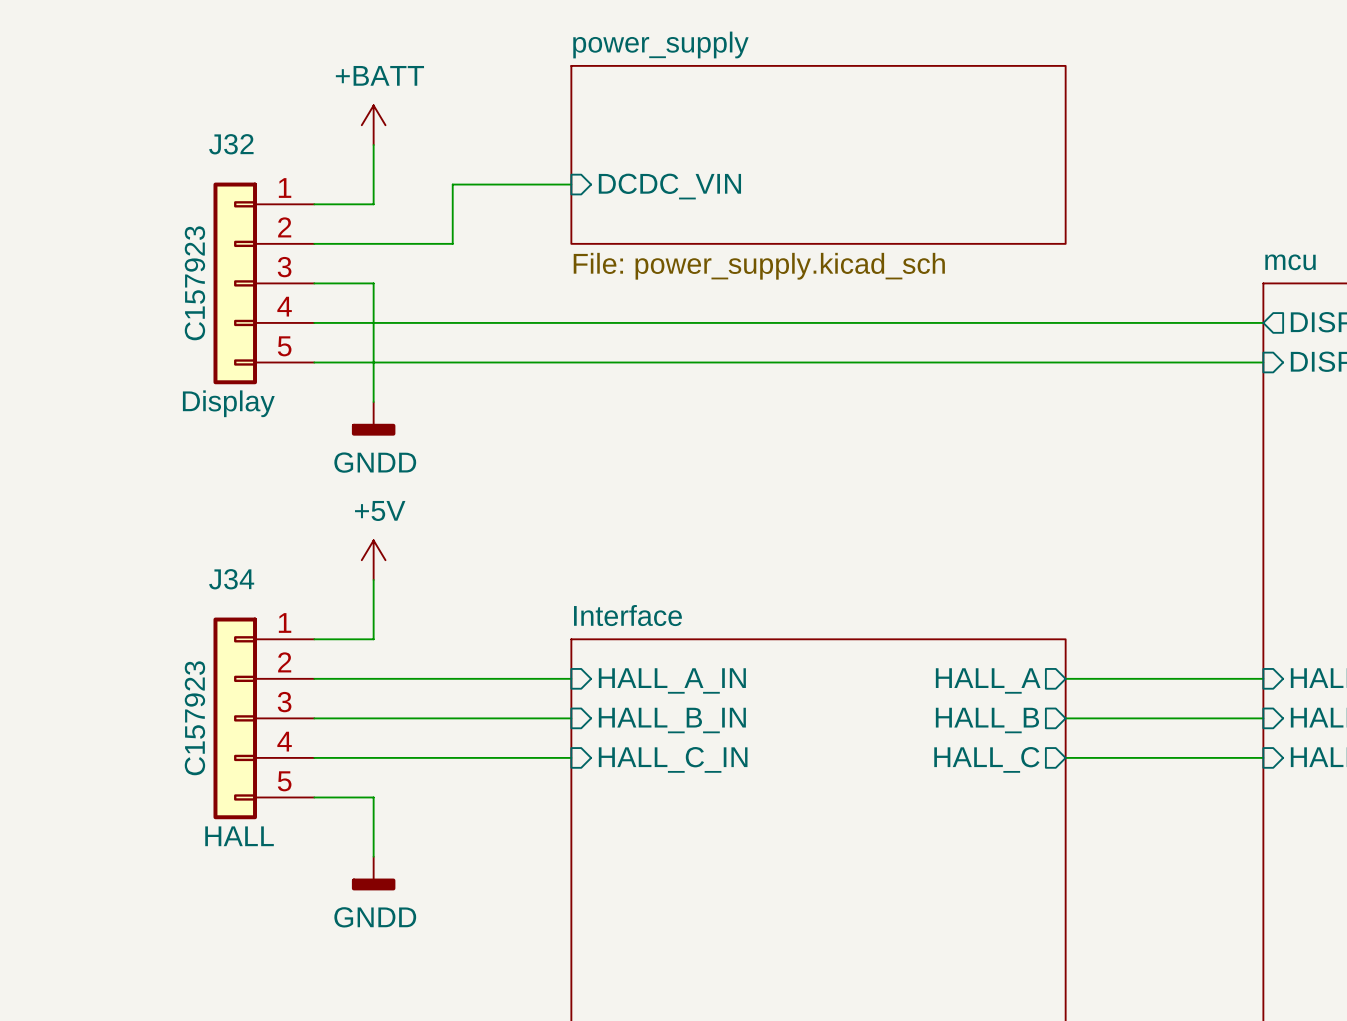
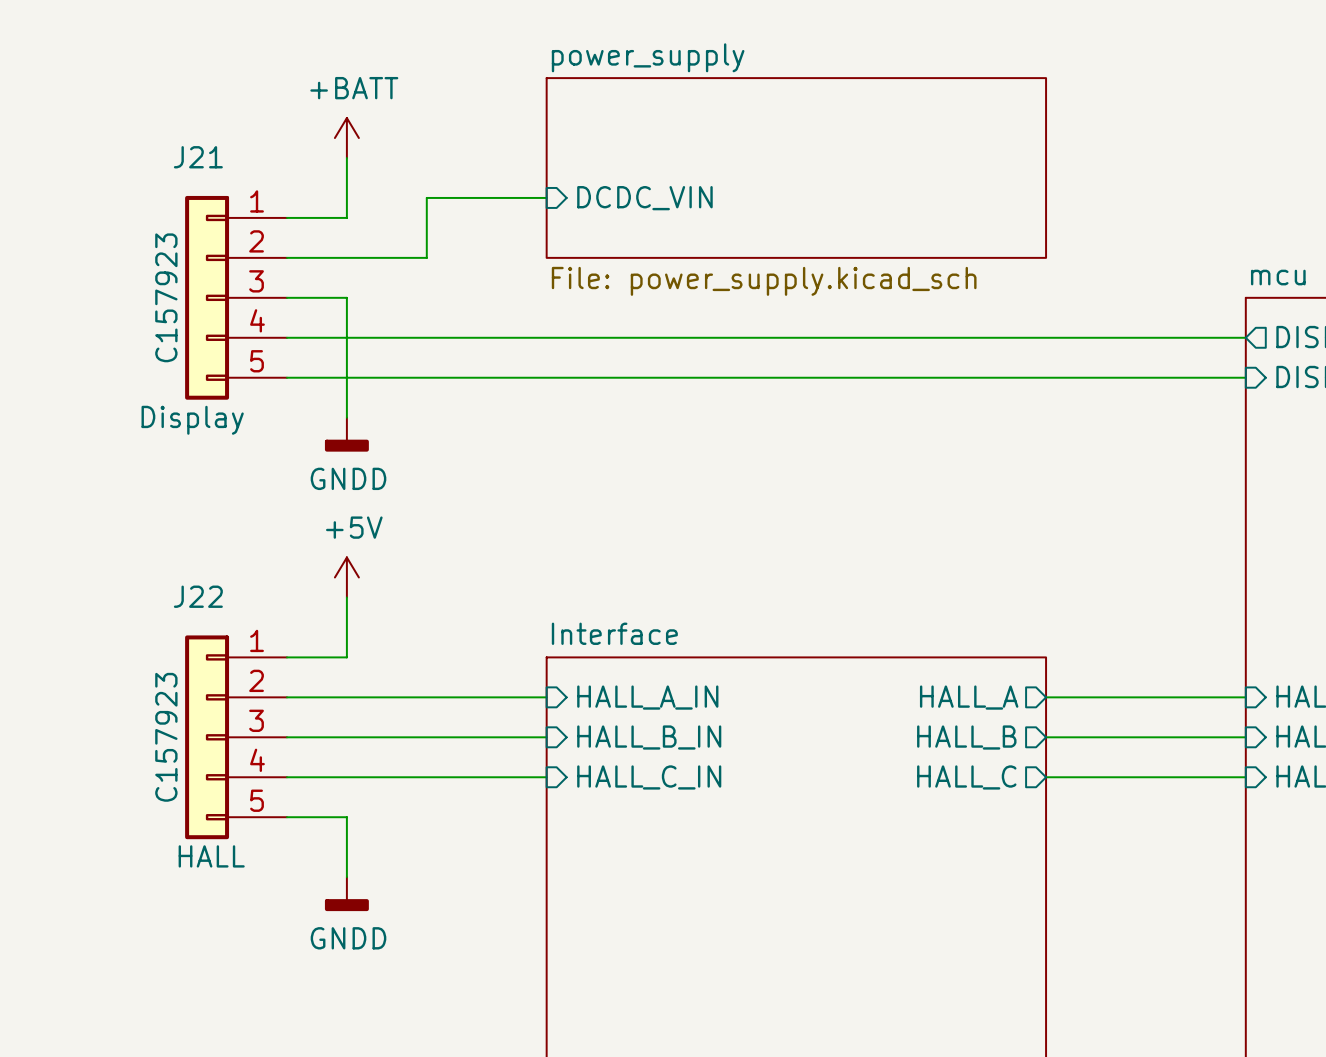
J32 name: J32 (231, 144) -> J21 (198, 157)
J34 name: J34 (231, 579) -> J22 (198, 596)

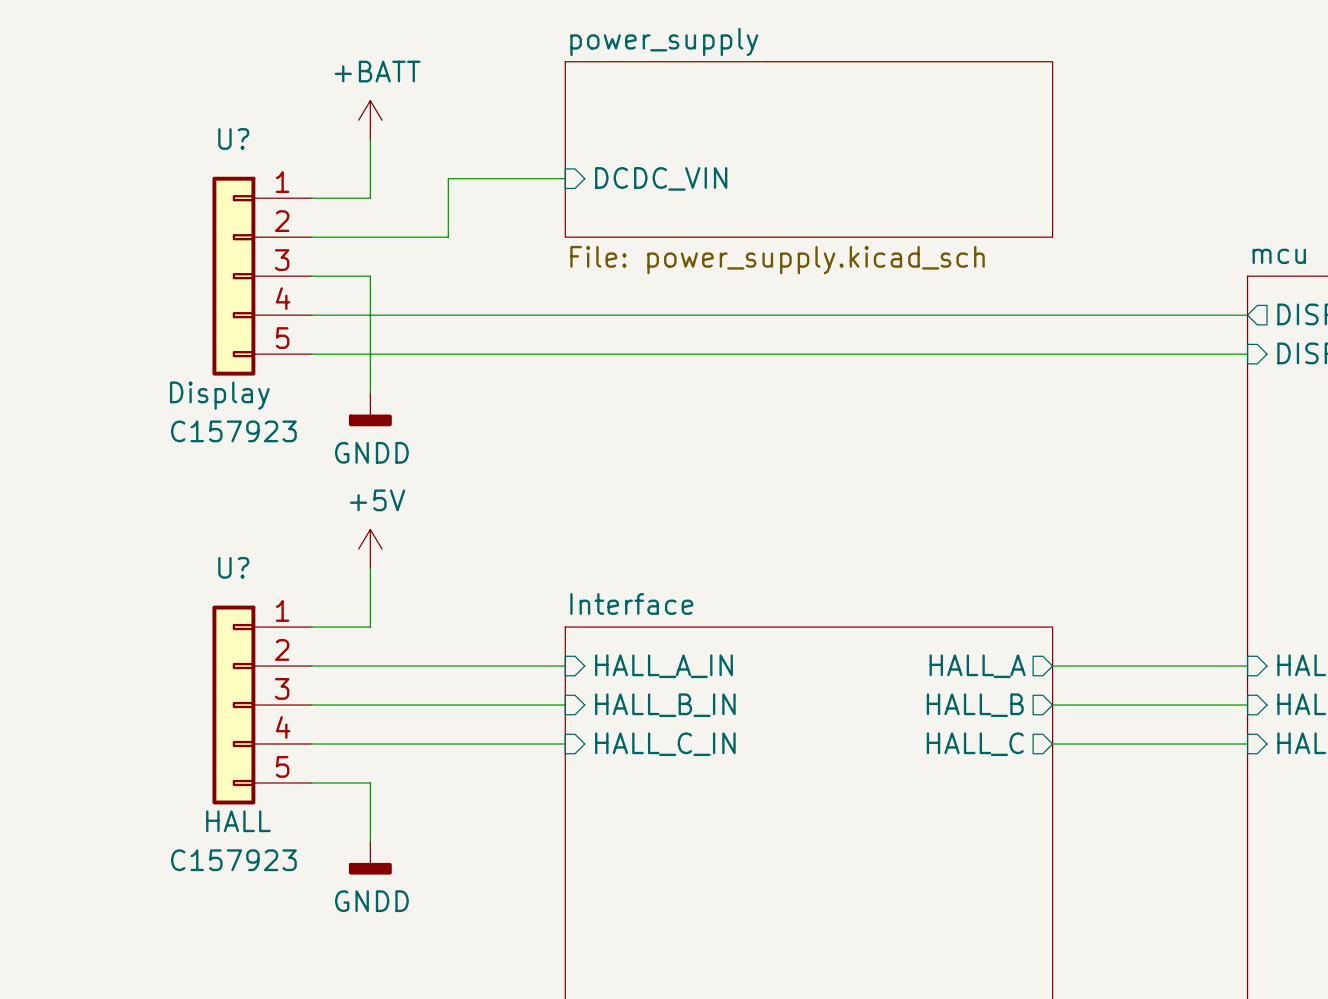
J21 name: J21 (198, 157) -> U? (233, 138)
J21 text: C157923 (166, 297) -> none
J21 text: none -> C157923 (233, 431)
J22 name: J22 (198, 596) -> U? (233, 567)
J22 text: C157923 (166, 737) -> none
J22 text: none -> C157923 (233, 860)

